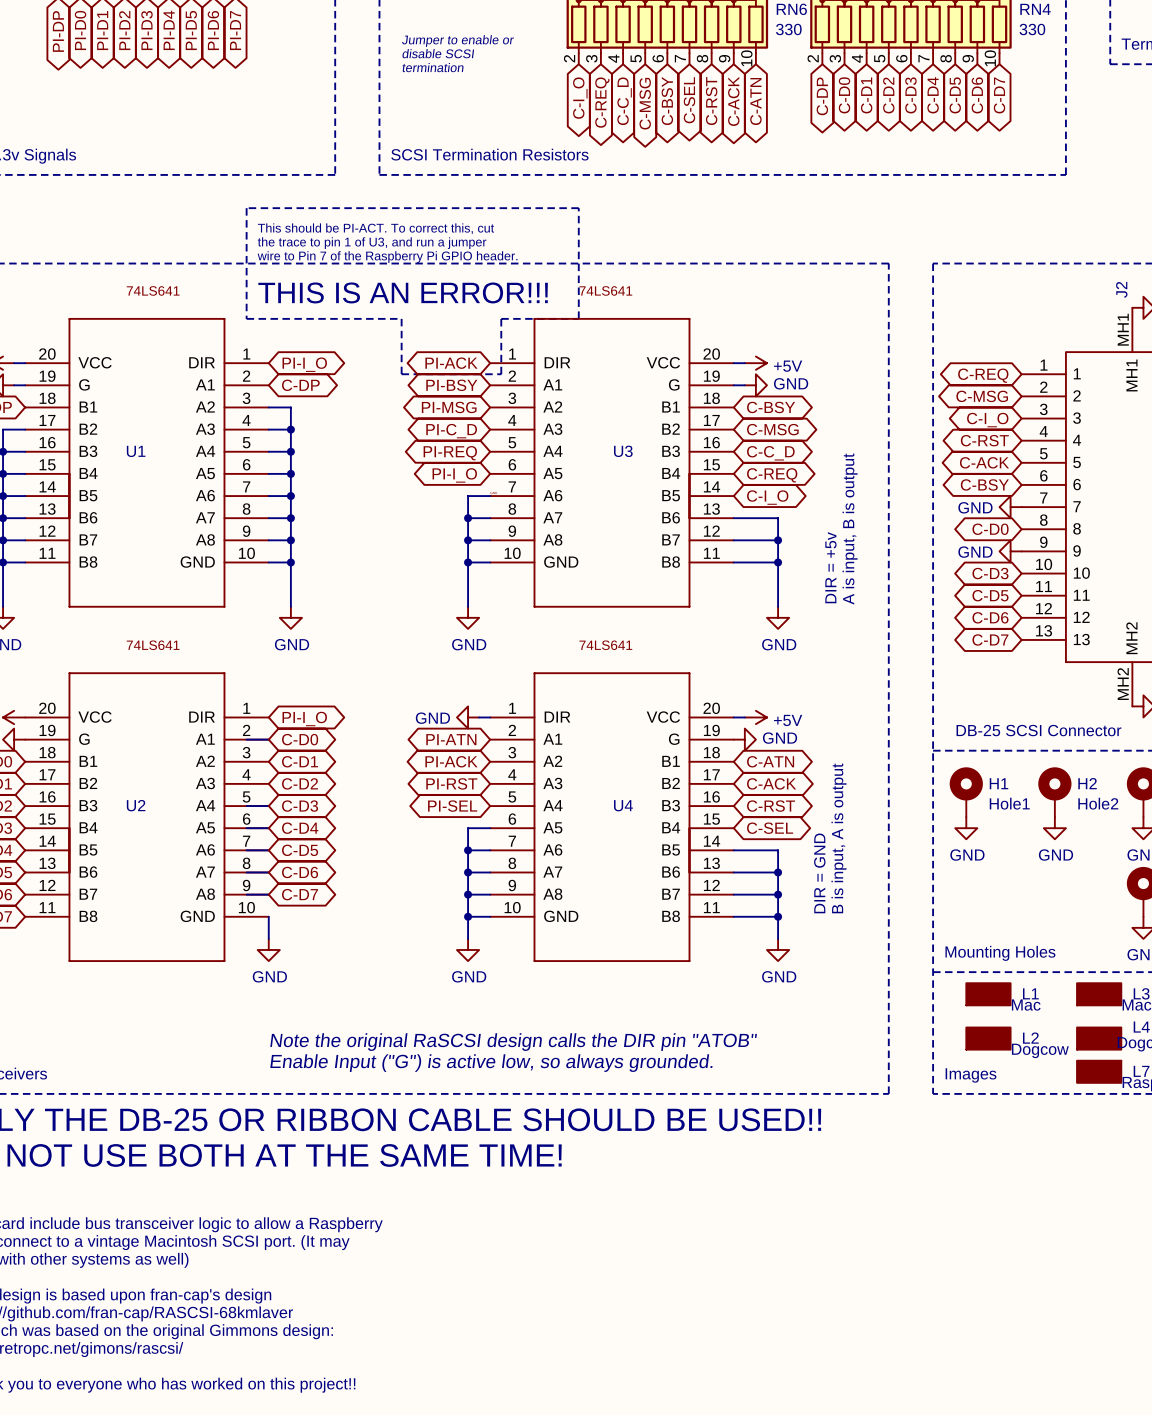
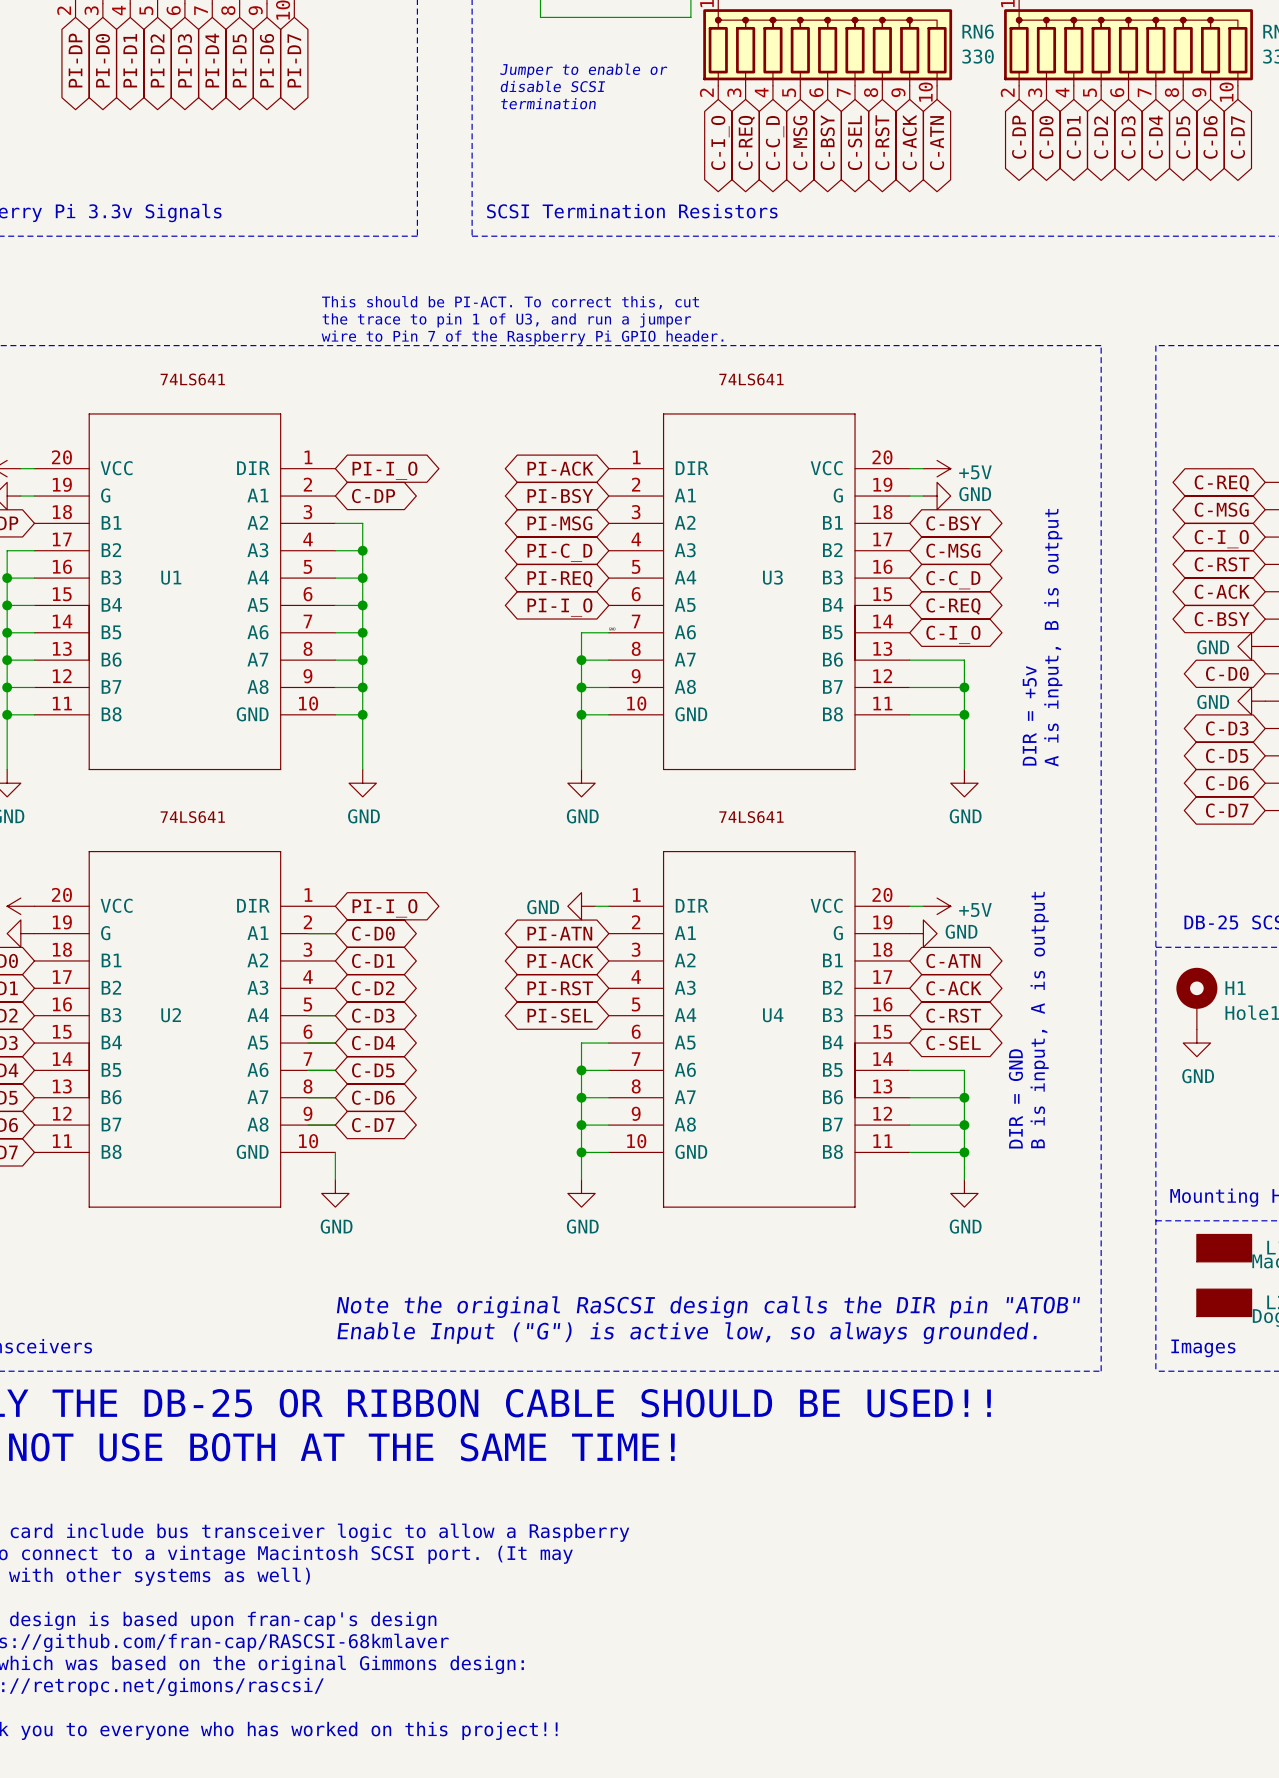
line: (246, 208) (246, 318) (401, 318) (401, 374) (501, 374) (501, 318) (578, 318) (578, 208) (246, 208) -> none
text: THIS IS AN ERROR!!! (403, 292) -> none

